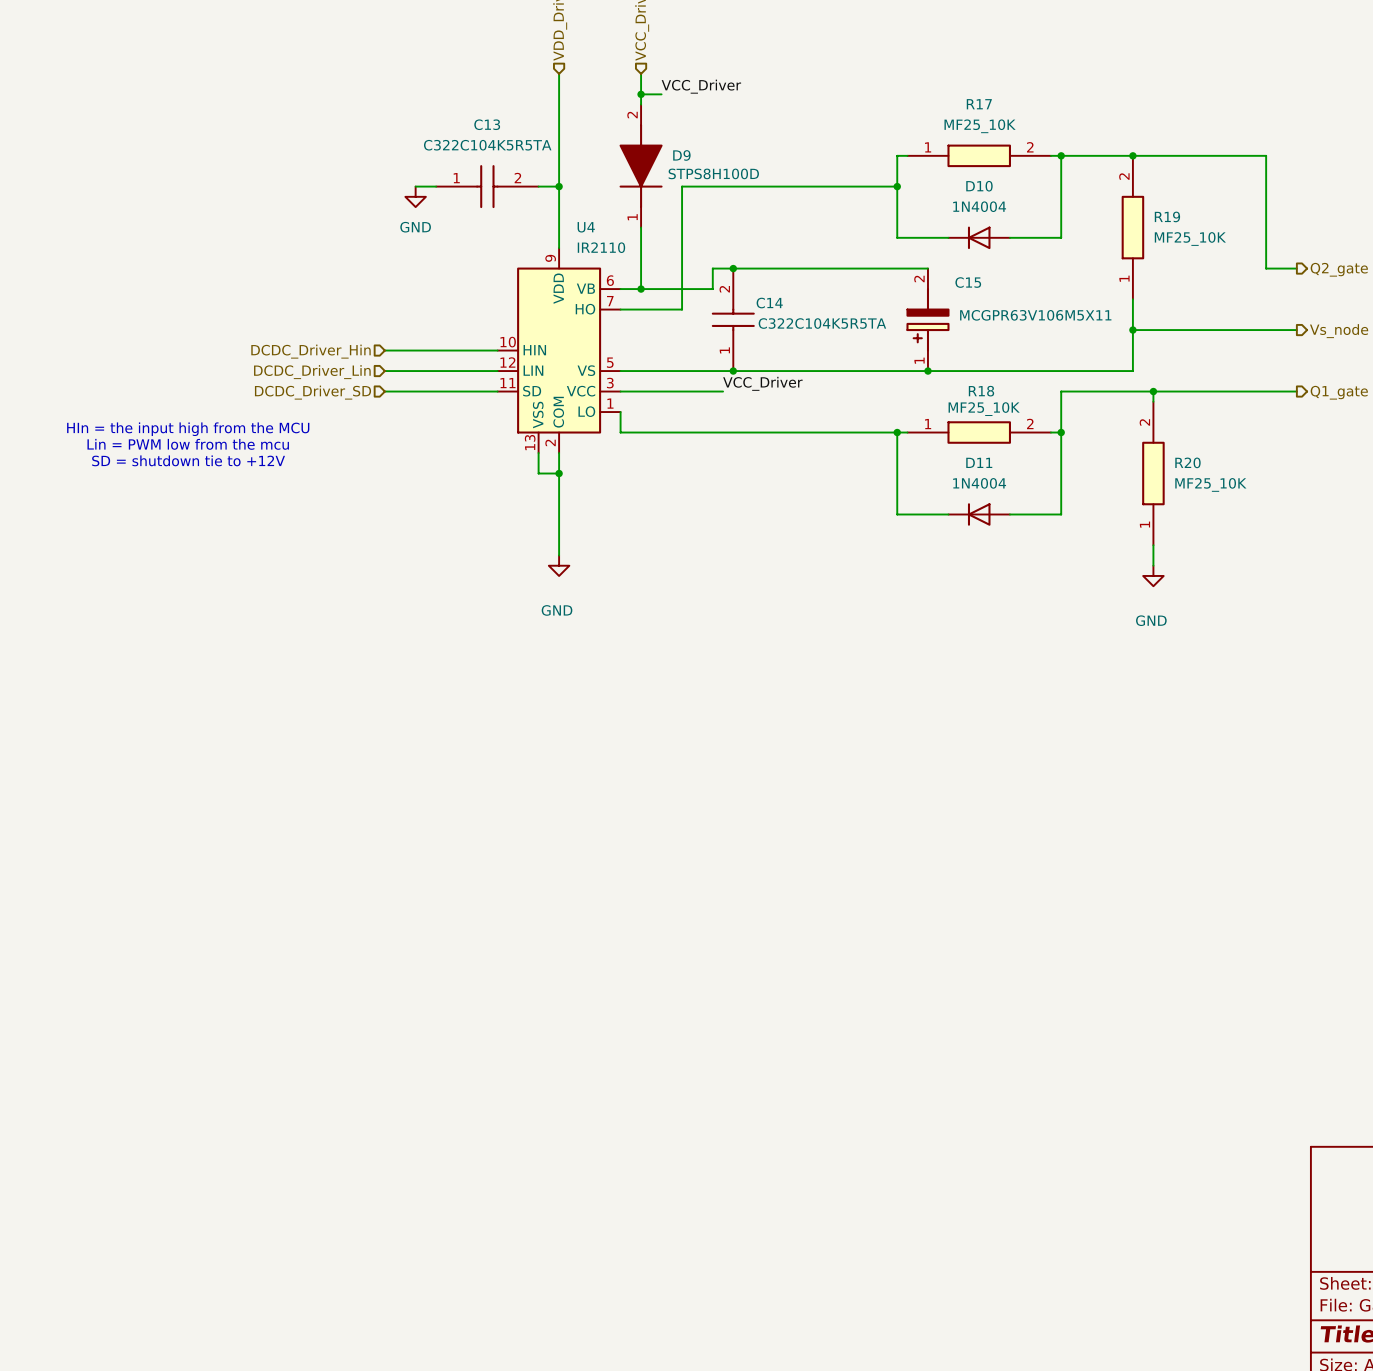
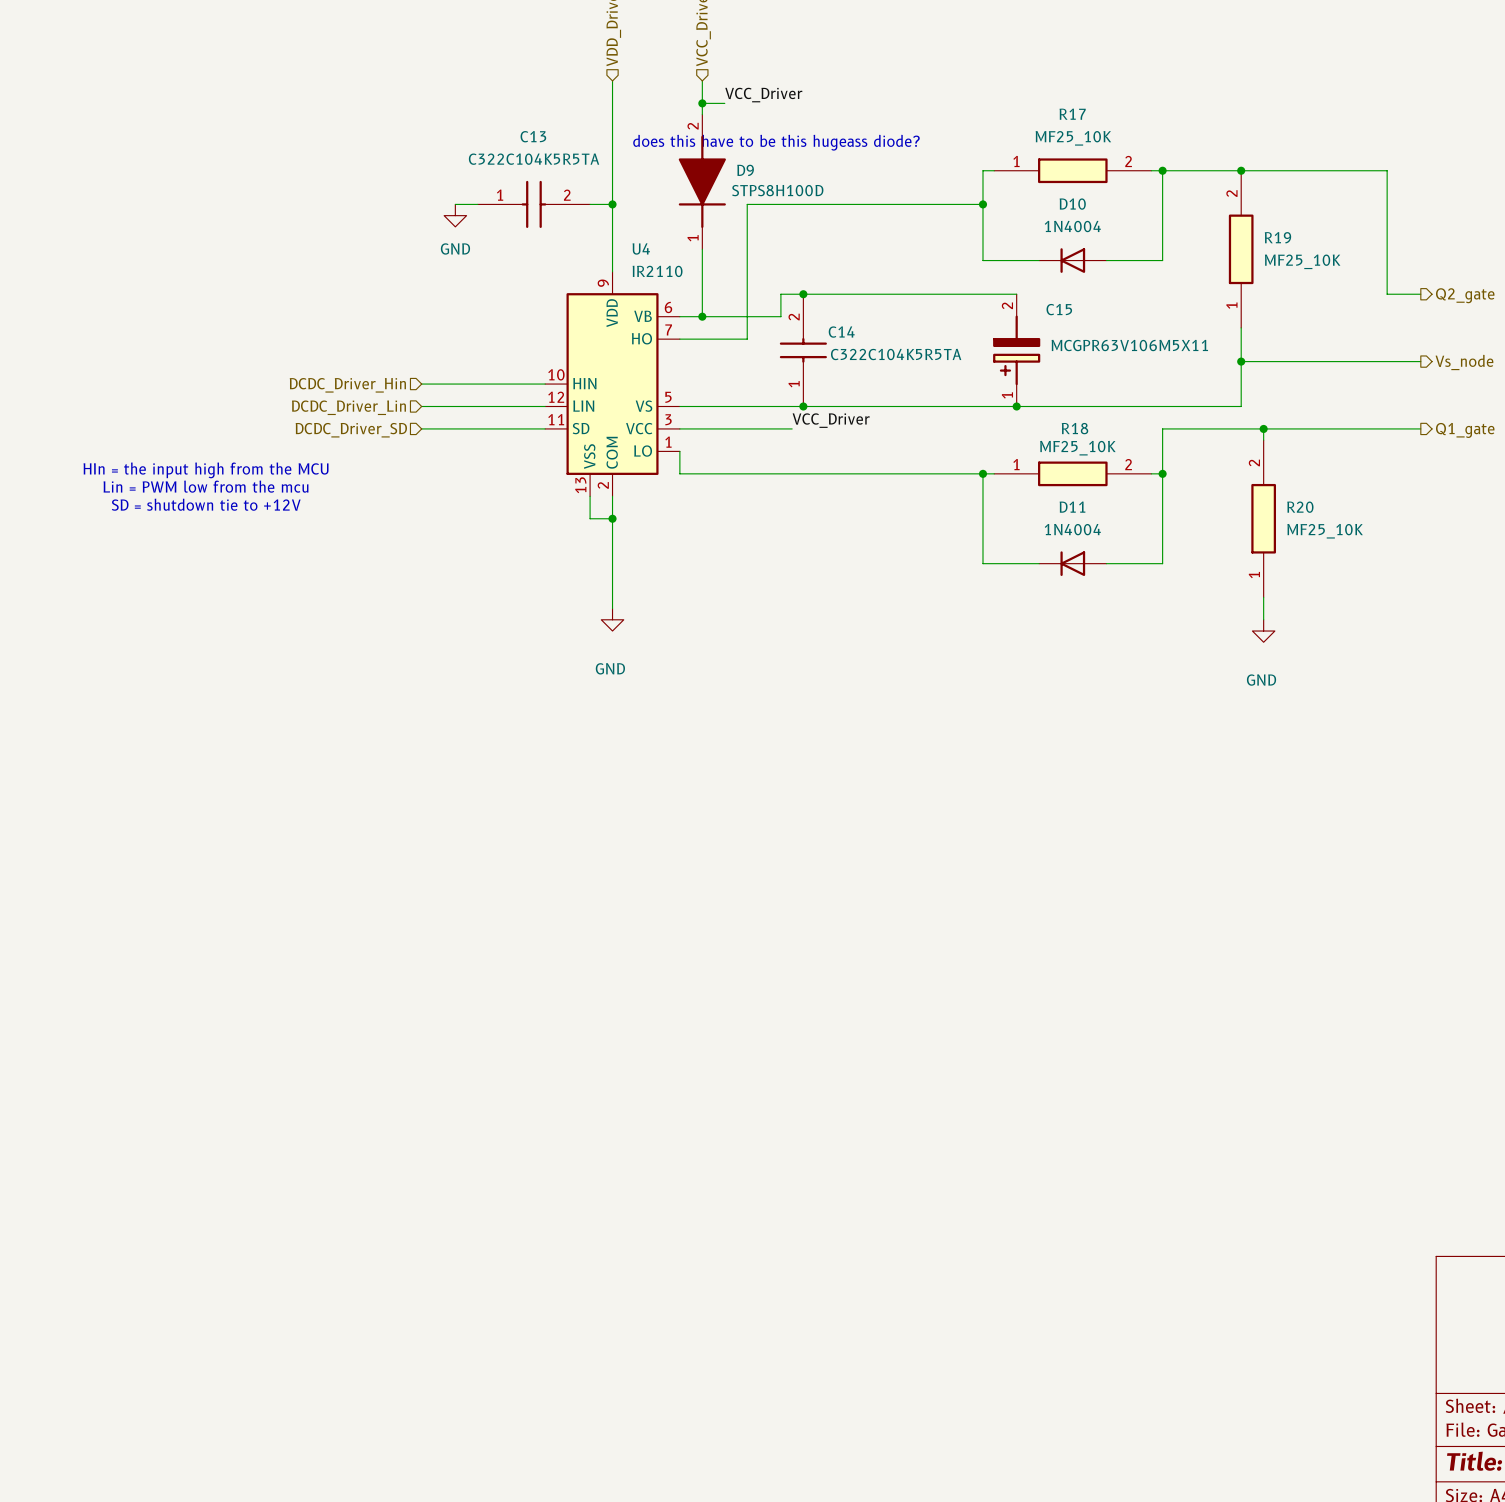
text: none -> does this have to be this hugeass diode? (776, 142)

